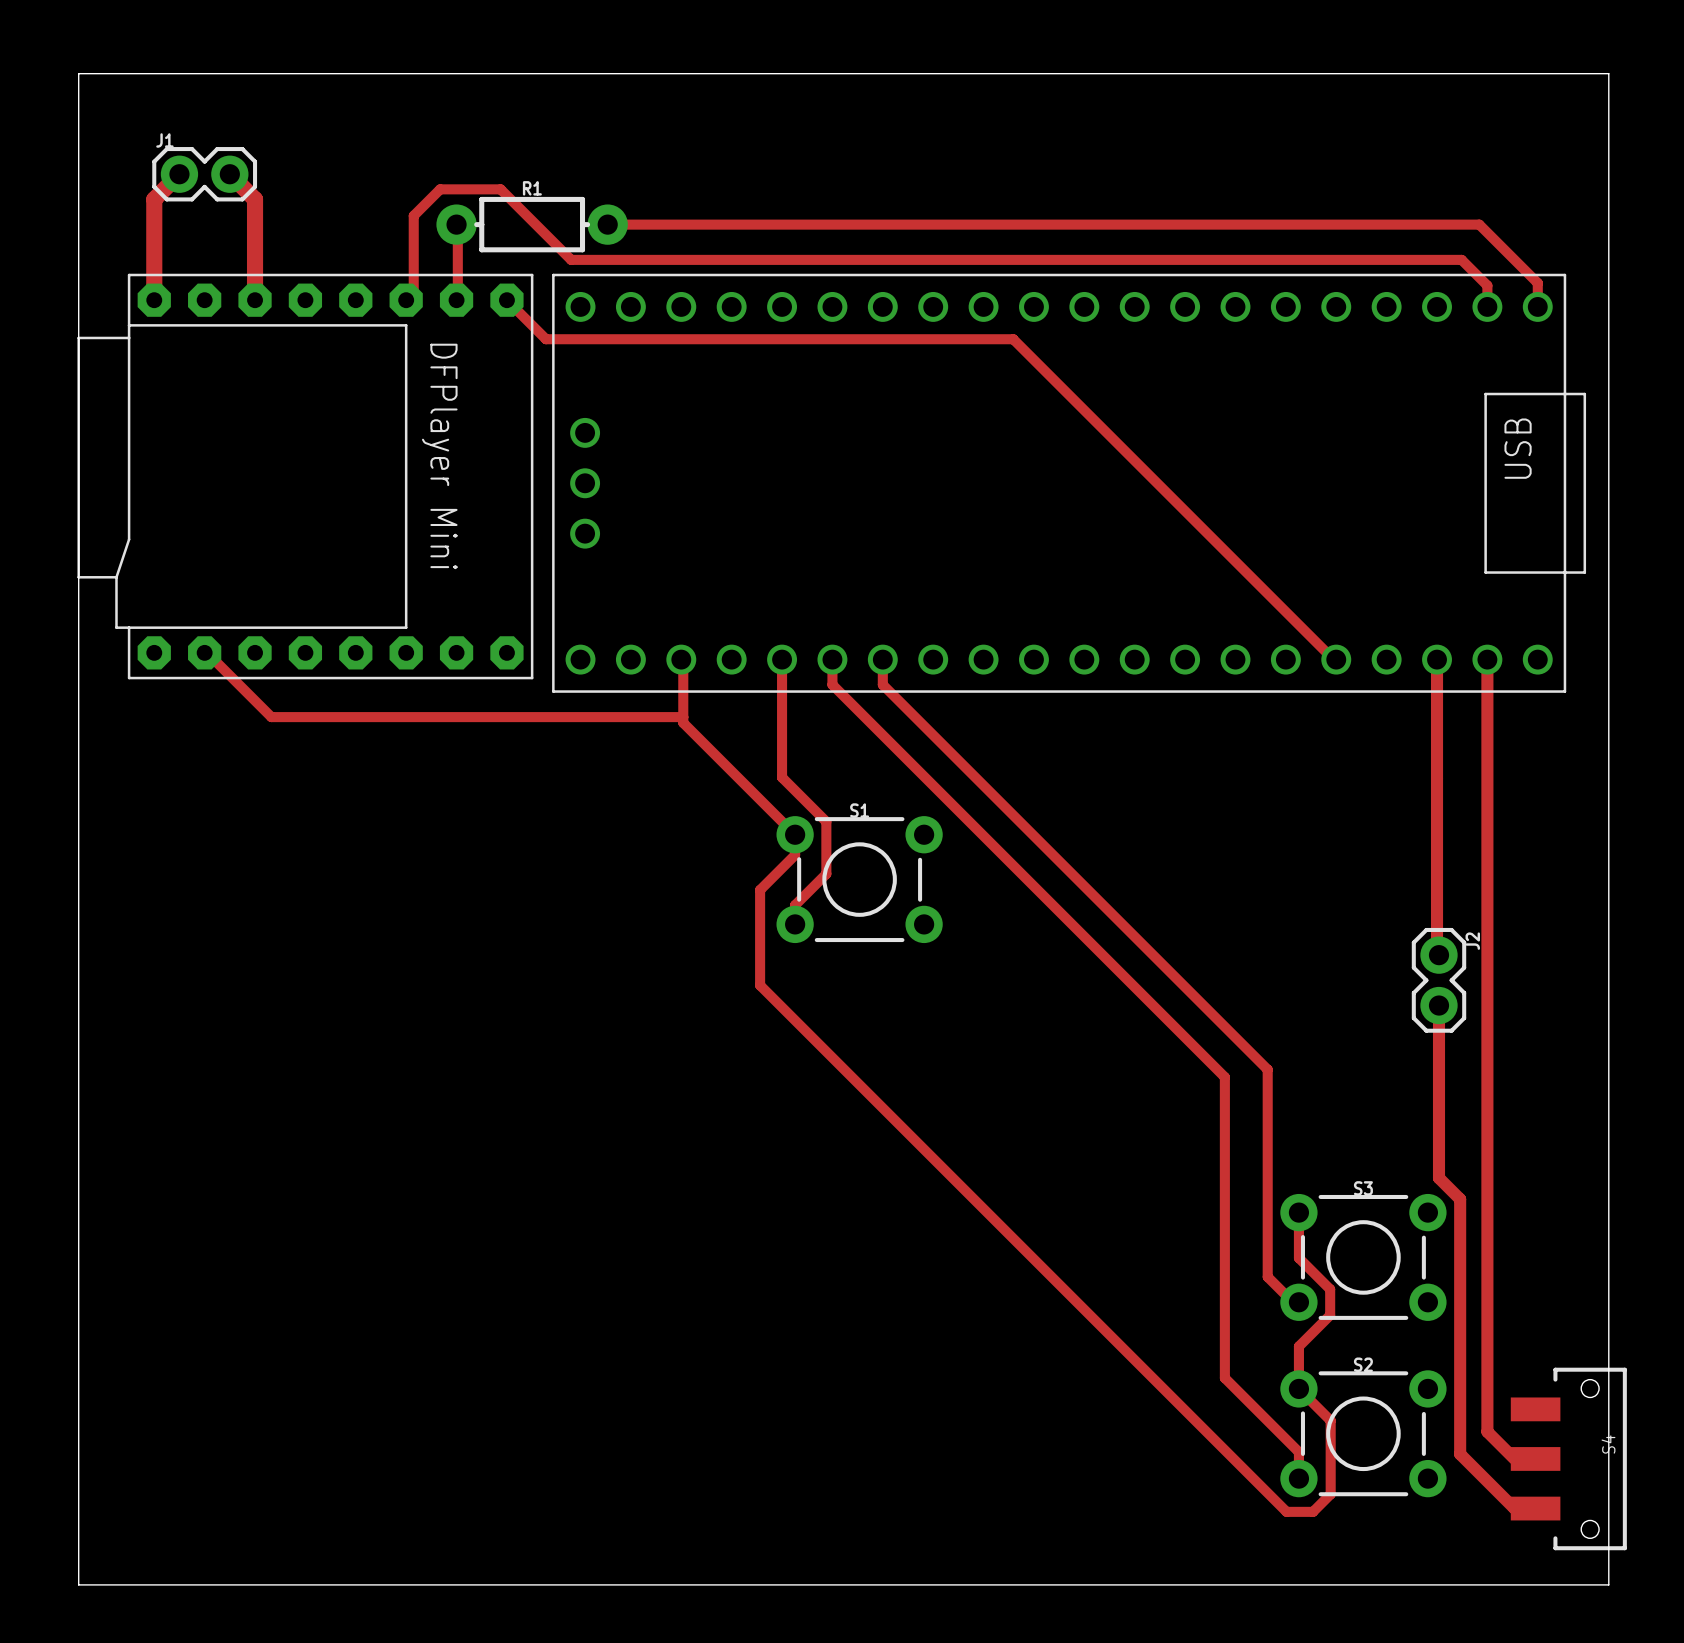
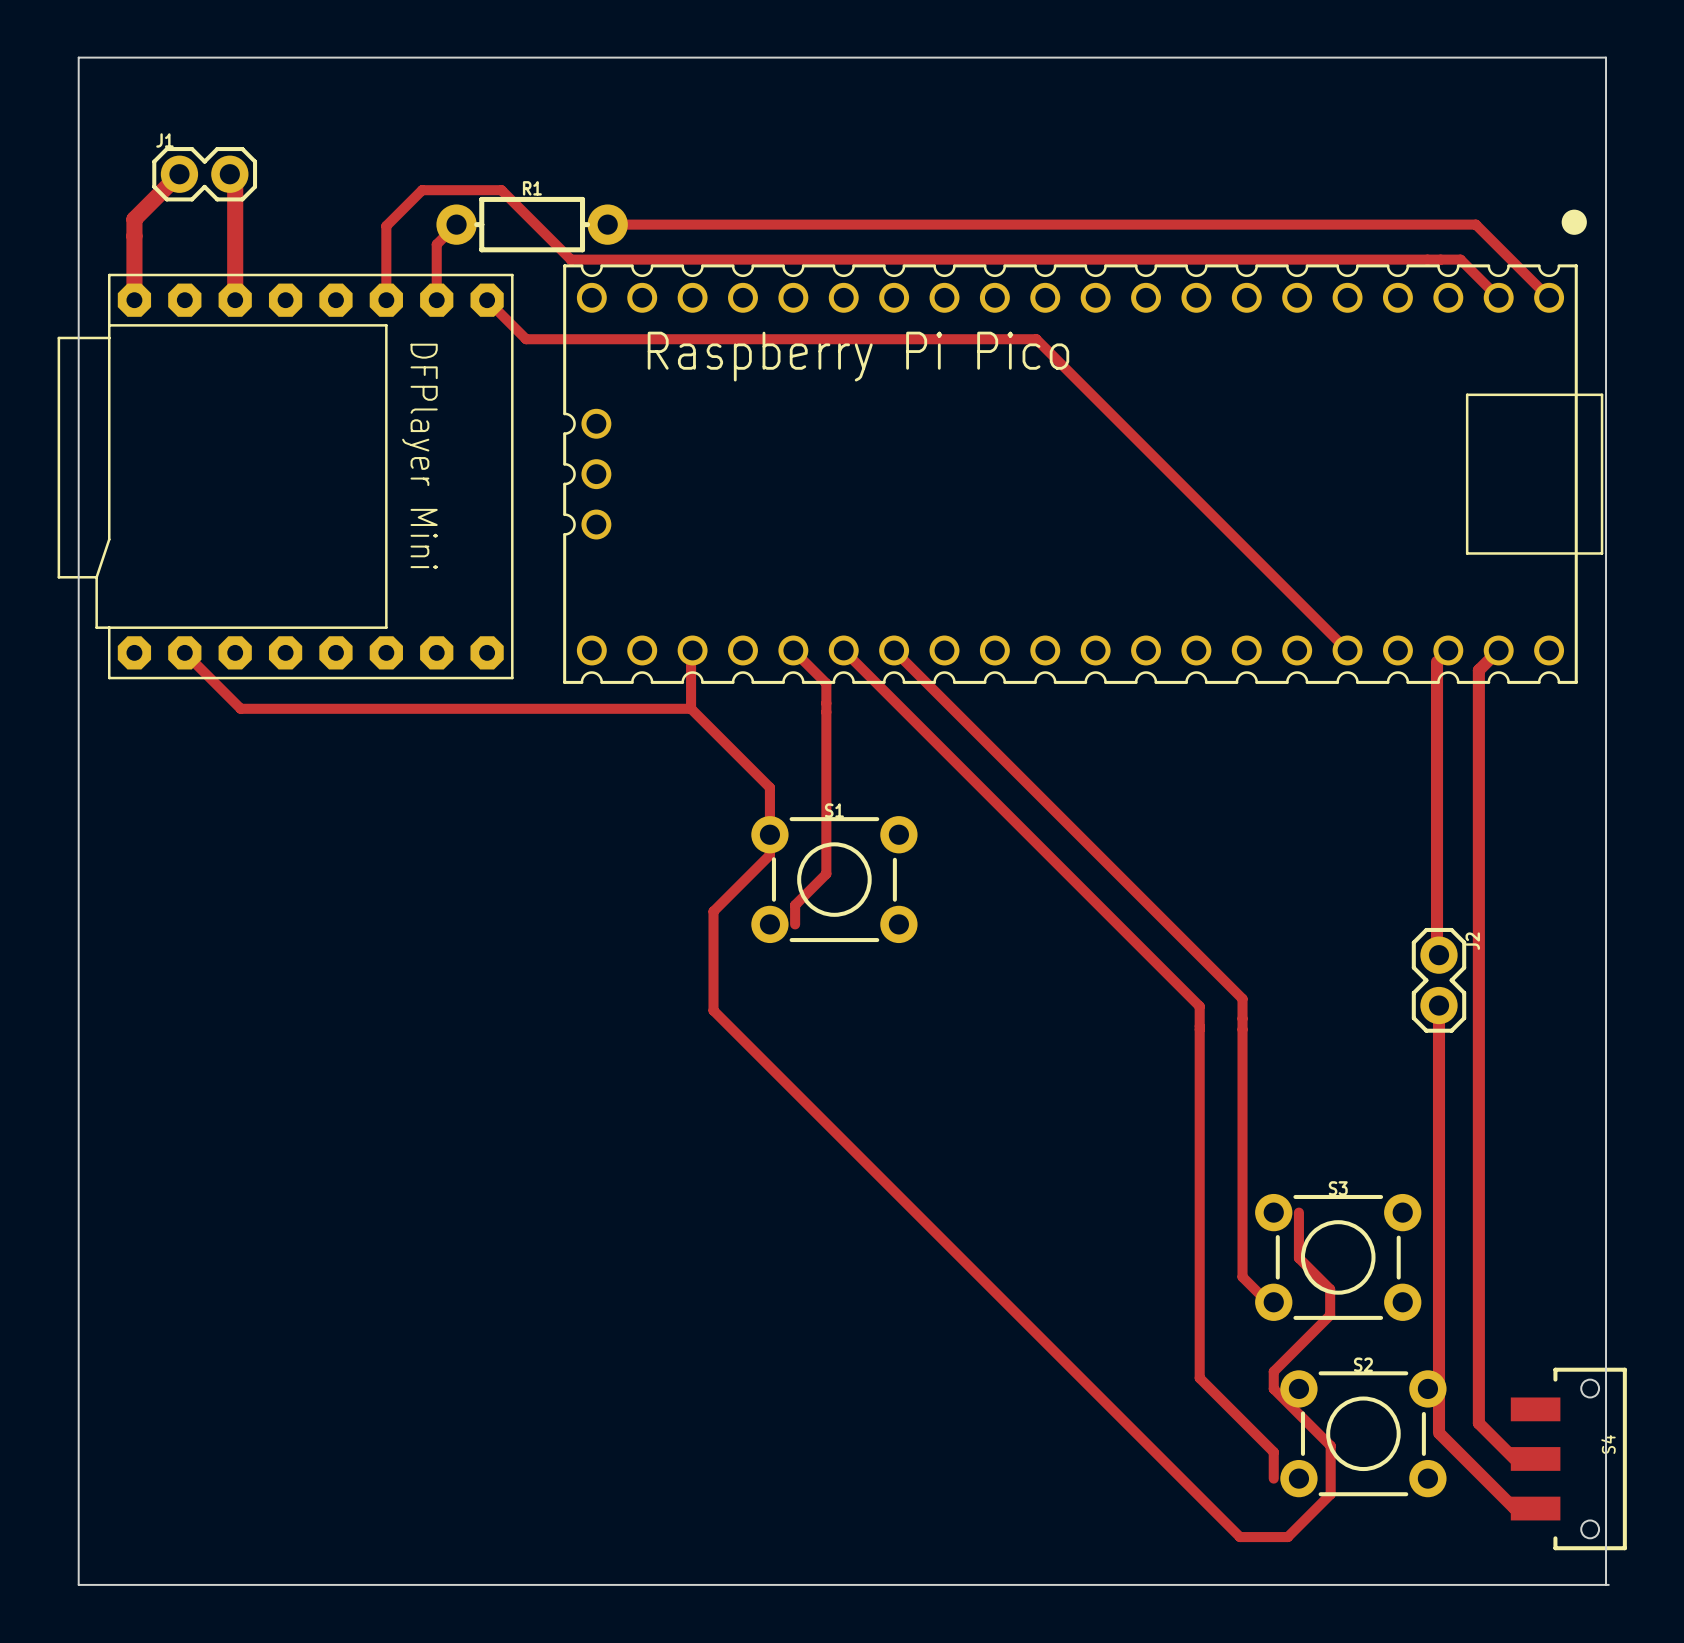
board edge: (78, 73) (1608, 73) (1608, 1584) -> (78, 73) (78, 57) (1606, 57) (1606, 1584)
top track: (235, 179) (255, 199) (255, 300) -> (235, 179) (235, 300)
top track: (501, 190) (440, 189) (413, 215) (413, 295) (406, 300) -> (501, 190) (422, 190) (386, 226) (386, 300)
top track: (154, 199) (154, 300) -> (154, 199) (134, 219) (134, 300)
top track: (456, 224) (456, 300) -> (456, 224) (436, 244) (436, 300)
top track: (1475, 224) (1479, 224) (1537, 283) (1537, 306) -> (1475, 224) (1549, 297)
top track: (571, 259) (1461, 259) (1487, 285) (1487, 306) -> (570, 259) (1460, 259) (1498, 297)
top track: (506, 300) (545, 339) -> (487, 300) (526, 339) (545, 339)
top track: (1013, 339) (1330, 656) (1336, 659) -> (1013, 339) (1036, 339) (1347, 650)
part: none -> (1083, 446)
part position: (305, 476) -> (285, 476)
part: (1069, 483) -> none
top track: none -> (692, 650) (691, 708)
top track: none -> (843, 650) (1199, 1006) (1199, 1378) (1273, 1452) (1273, 1478)
top track: none -> (894, 650) (1242, 998) (1242, 1276) (1267, 1302) (1273, 1302)
top track: none -> (184, 652) (240, 708) (691, 708)
top track: (204, 652) (210, 656) (271, 717) (683, 717) -> none
top track: (681, 659) (683, 661) (683, 722) (795, 834) (795, 855) (760, 890) (760, 985) (1286, 1511) (1313, 1511) -> (691, 708) (769, 787) (769, 855) (713, 911) (713, 1010) (1239, 1537) (1287, 1537) (1313, 1511)
top track: (782, 659) (782, 777) (826, 821) -> (793, 650) (826, 683) (826, 821)
top track: (832, 659) (832, 684) (1224, 1077) (1224, 1378) (1298, 1452) (1298, 1478) -> none
top track: (882, 659) (882, 684) (1267, 1069) (1267, 1276) (1292, 1302) (1298, 1302) -> none
top track: (1487, 659) (1487, 1431) -> (1498, 650) (1478, 670) (1478, 1423) (1487, 1431)
S1 position: (859, 879) -> (834, 879)
top track: (1439, 1178) (1460, 1199) (1460, 1454) -> (1439, 1178) (1439, 1432) (1460, 1454)
S3 position: (1363, 1257) -> (1338, 1257)
top track: (1298, 1346) (1298, 1388) (1330, 1420) (1330, 1445) -> (1298, 1346) (1273, 1371) (1273, 1388) (1330, 1445)

